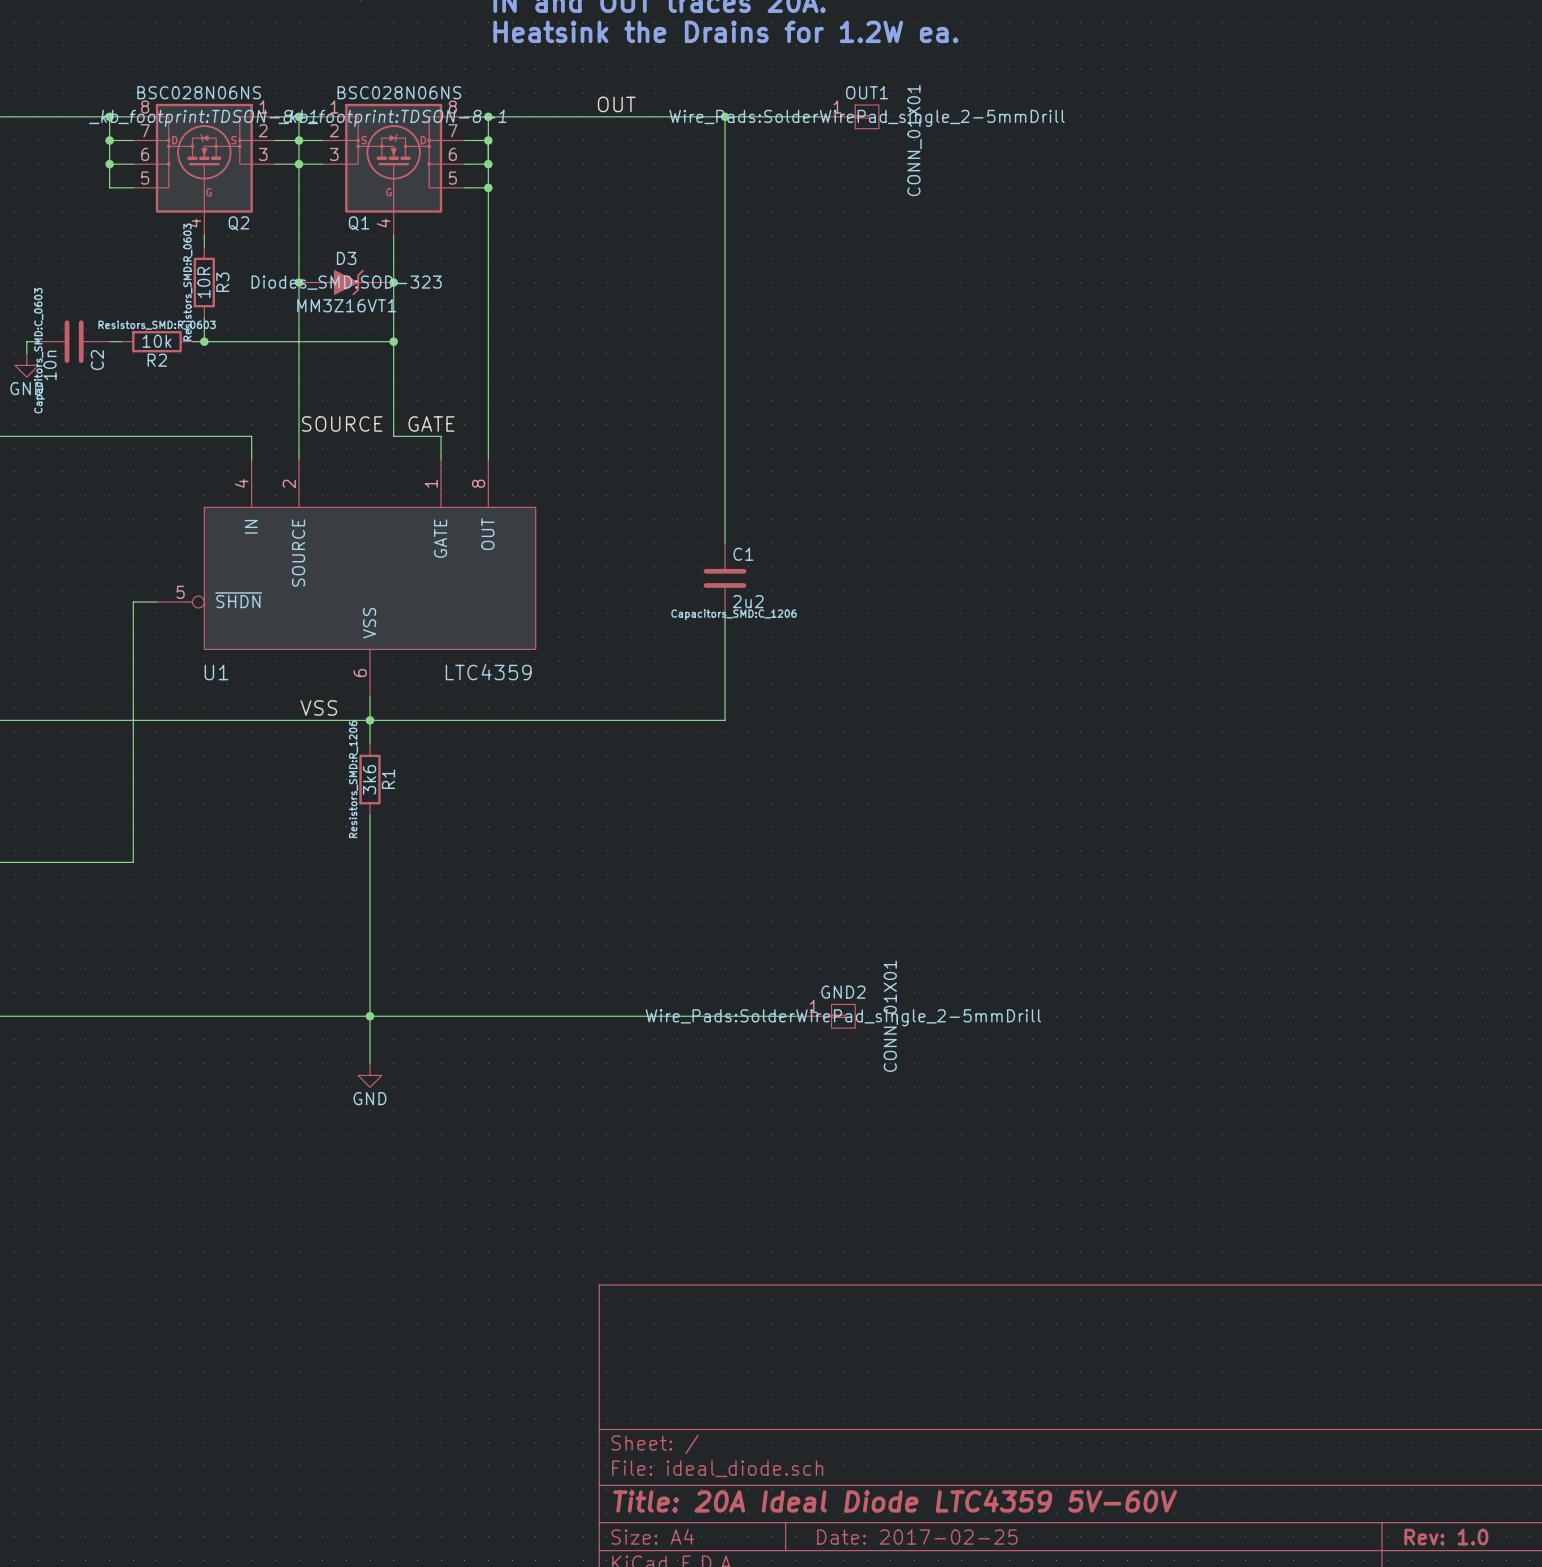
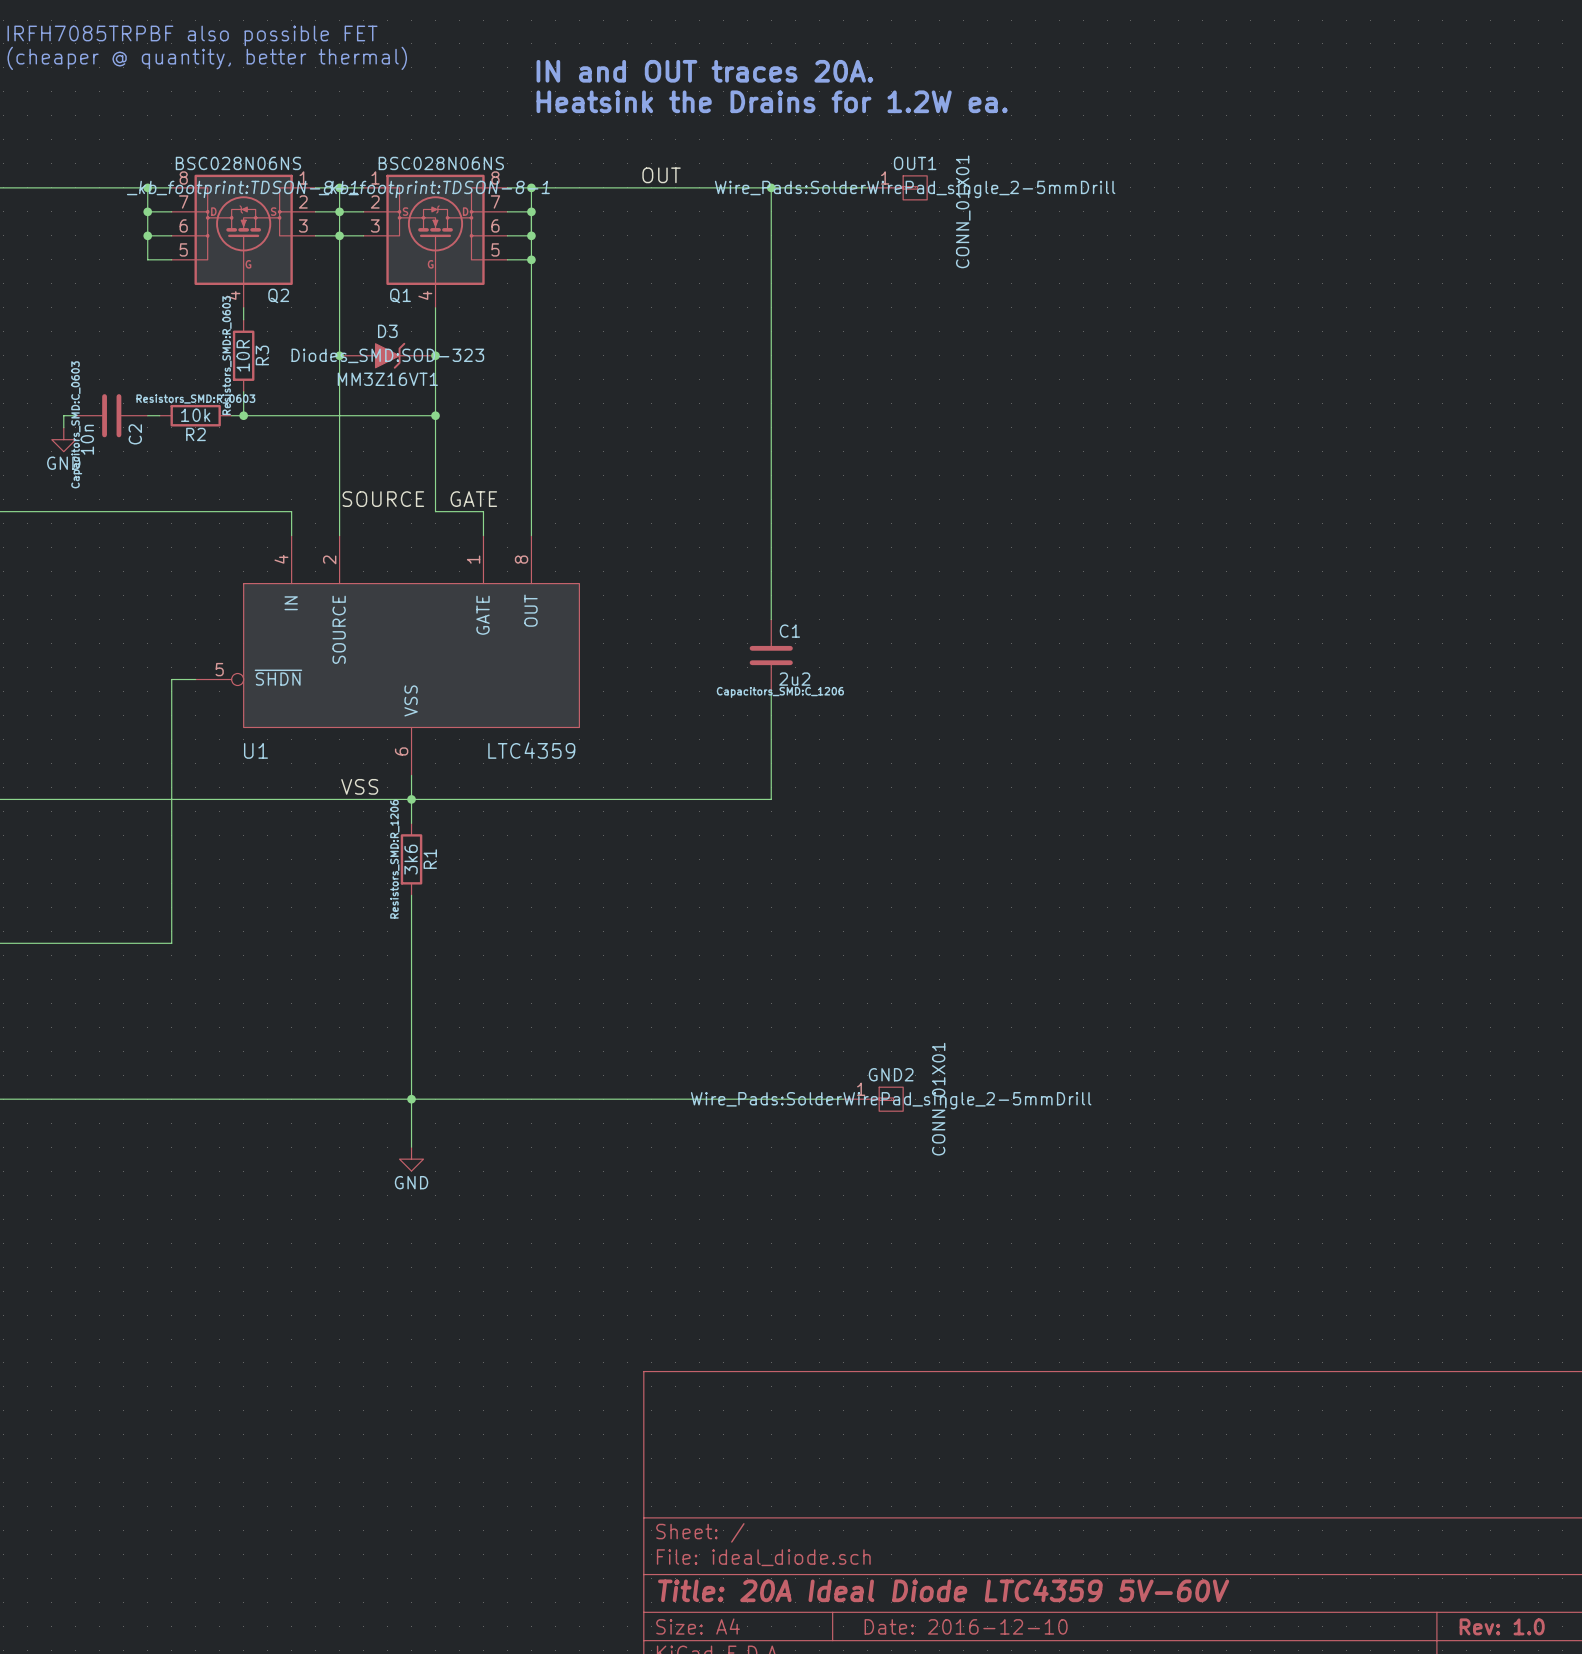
title block: Date: 2017-02-25 (917, 1537) -> Date: 2016-12-10 (966, 1626)

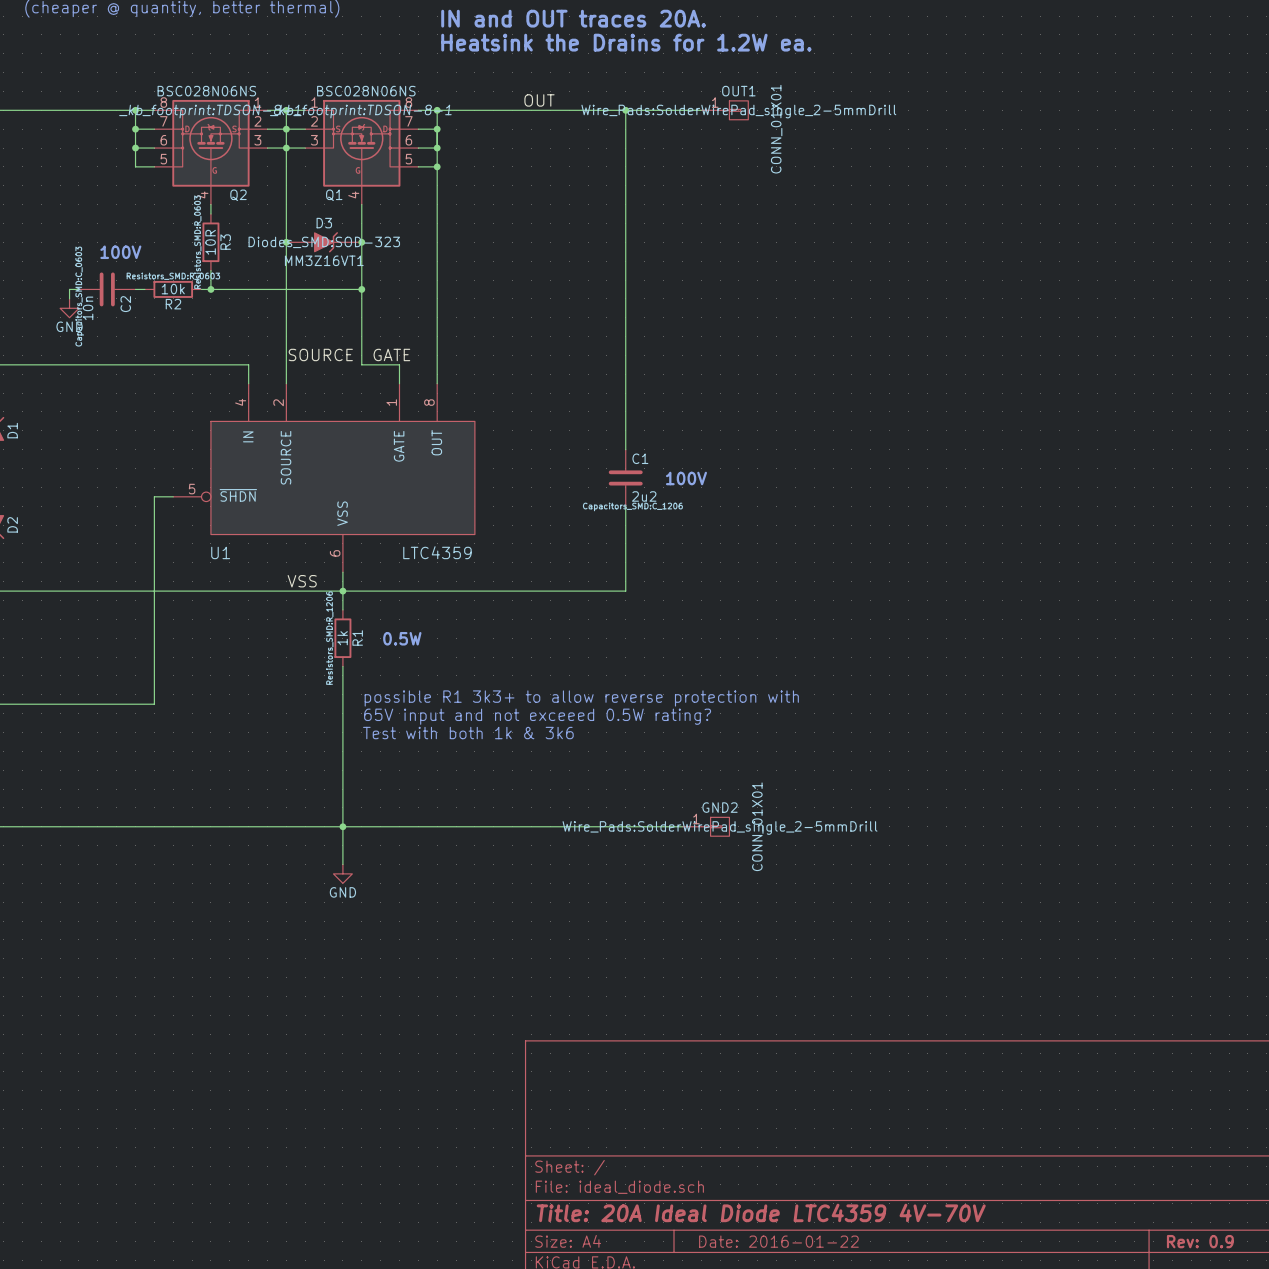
text: none -> 100V (120, 252)
text: none -> 100V (686, 478)
R1 value: 3k6 (411, 859) -> 1k (342, 638)
text: none -> 0.5W (402, 638)
text: none -> possible R1 3k3+ to allow reverse protection with (581, 698)
text: none -> 65V input and not exceeed 0.5W rating? (537, 716)
text: none -> Test with both 1k & 3k6 (468, 733)
title block: Title: 20A Ideal Diode LTC4359 5V-60V (943, 1590) -> Title: 20A Ideal Diode LTC4359 4V-70V (761, 1212)
title block: Date: 2016-12-10 (966, 1626) -> Date: 2016-01-22 (778, 1241)
title block: Rev: 1.0 (1502, 1626) -> Rev: 0.9 (1200, 1241)

